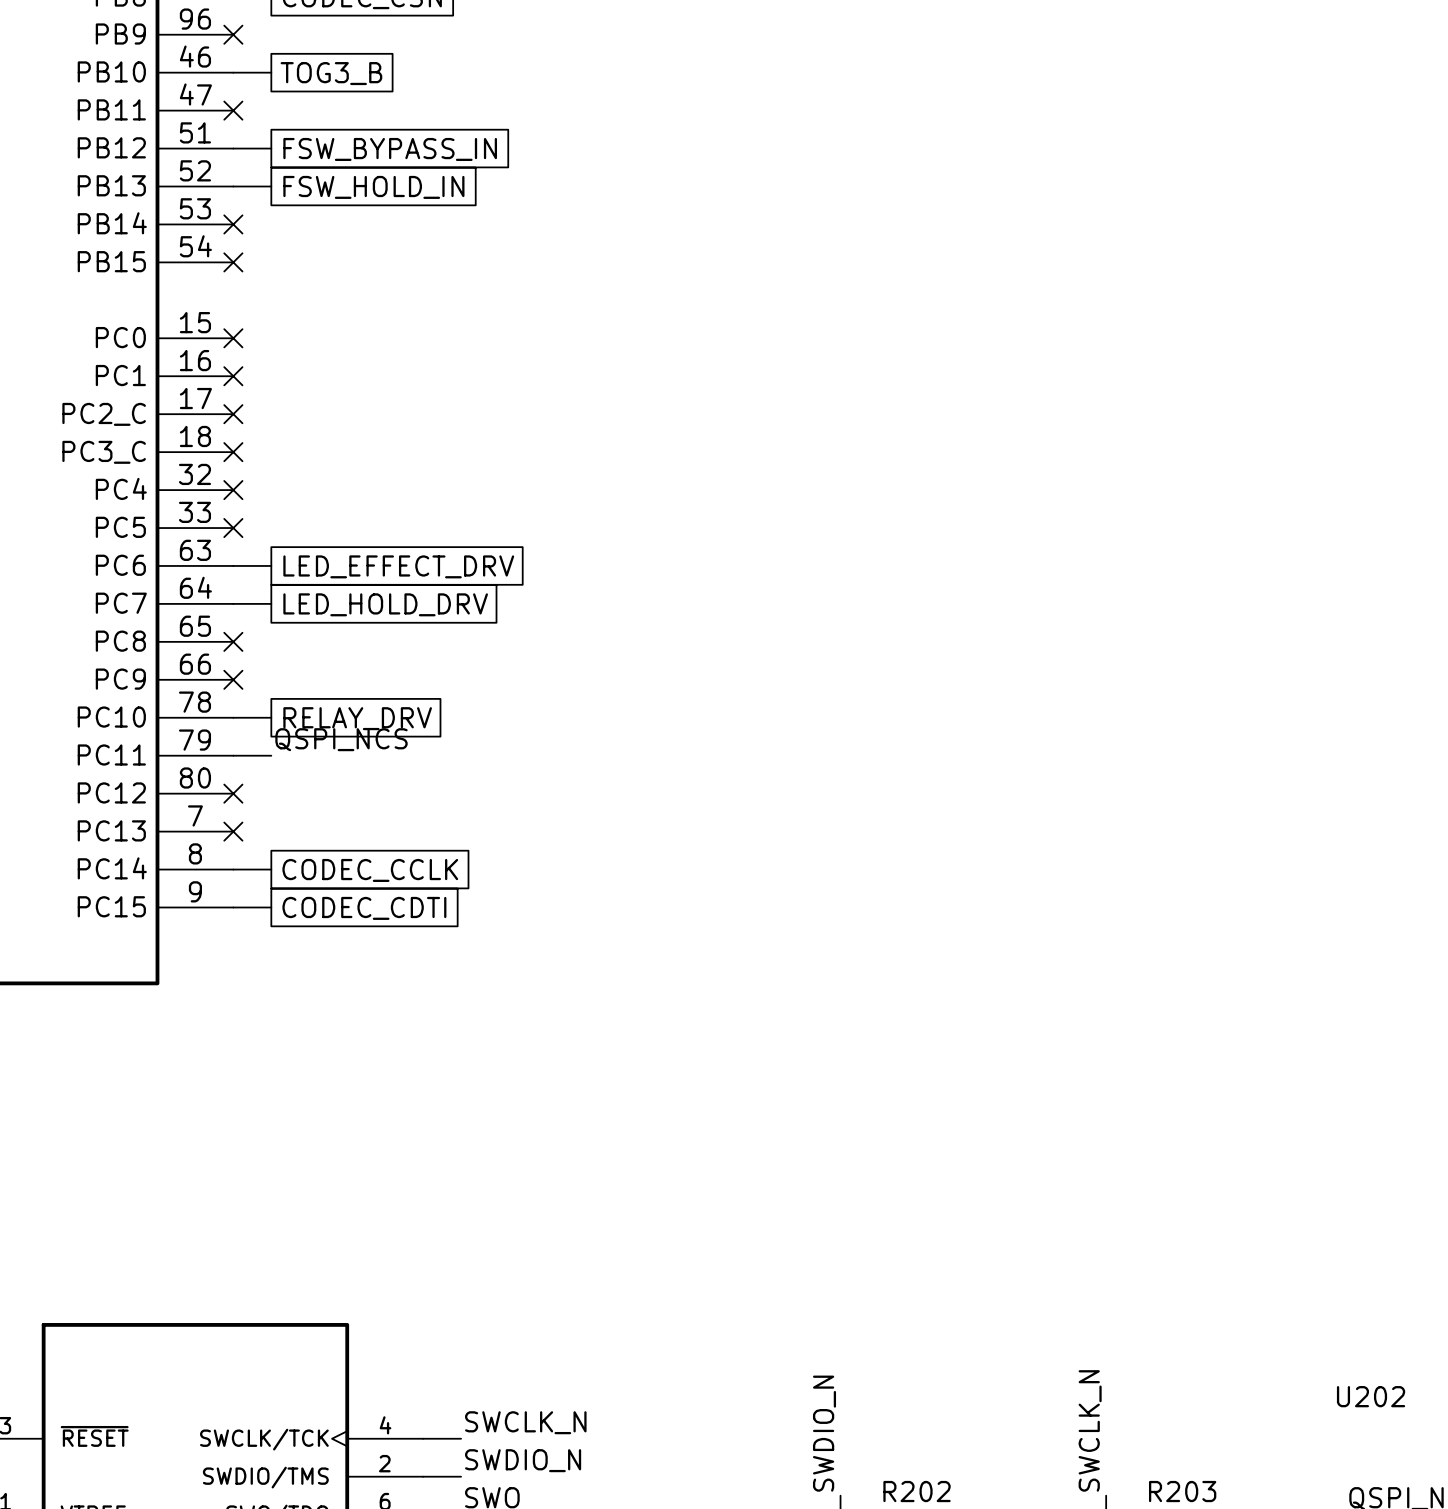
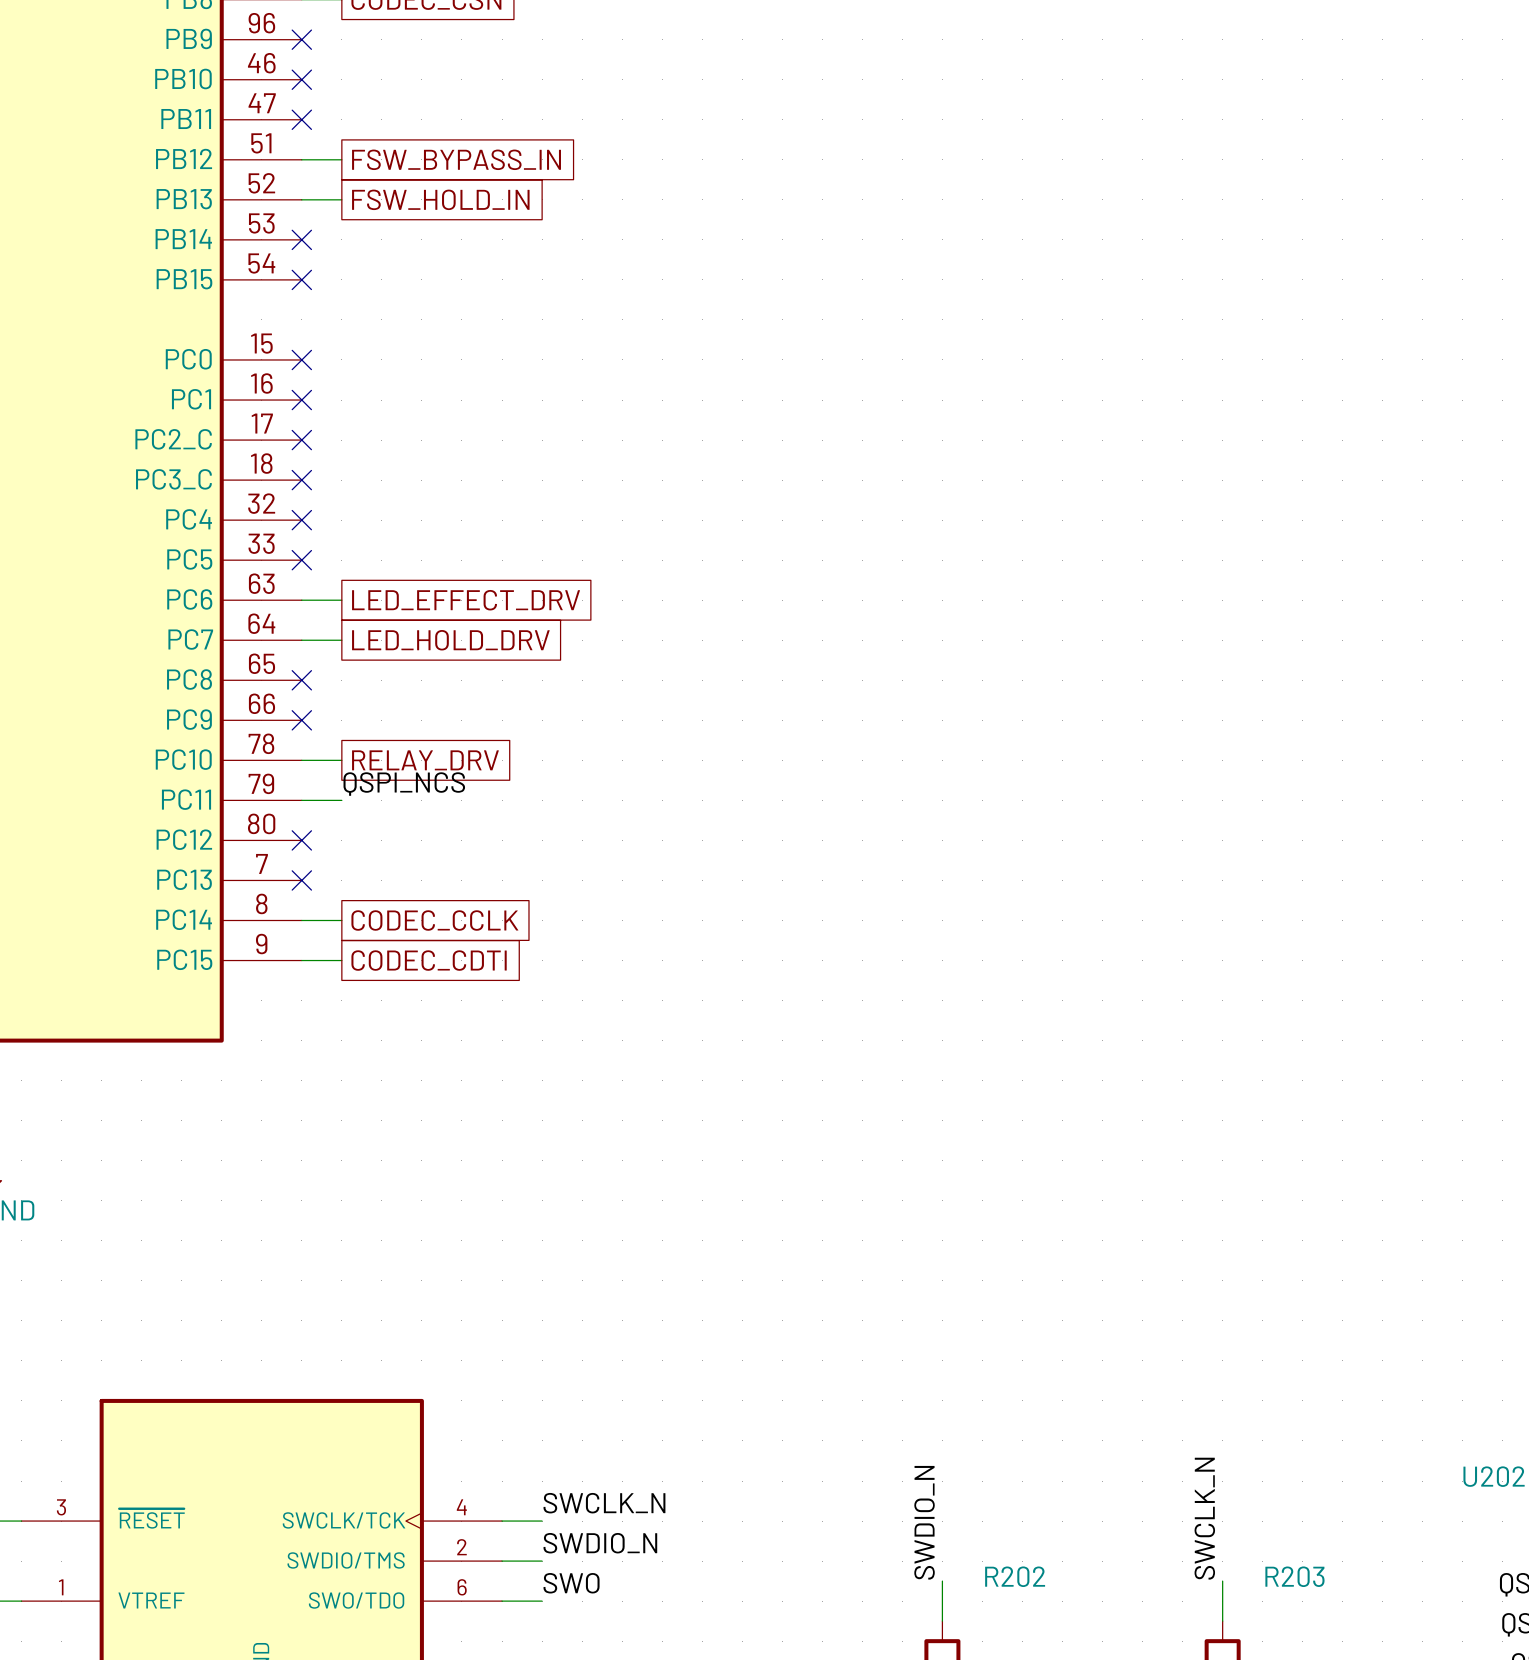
wire: (233, 72) (271, 72) -> none
no-connect mark: none -> (301, 79)
global label: TOG3_B (331, 73) -> none

